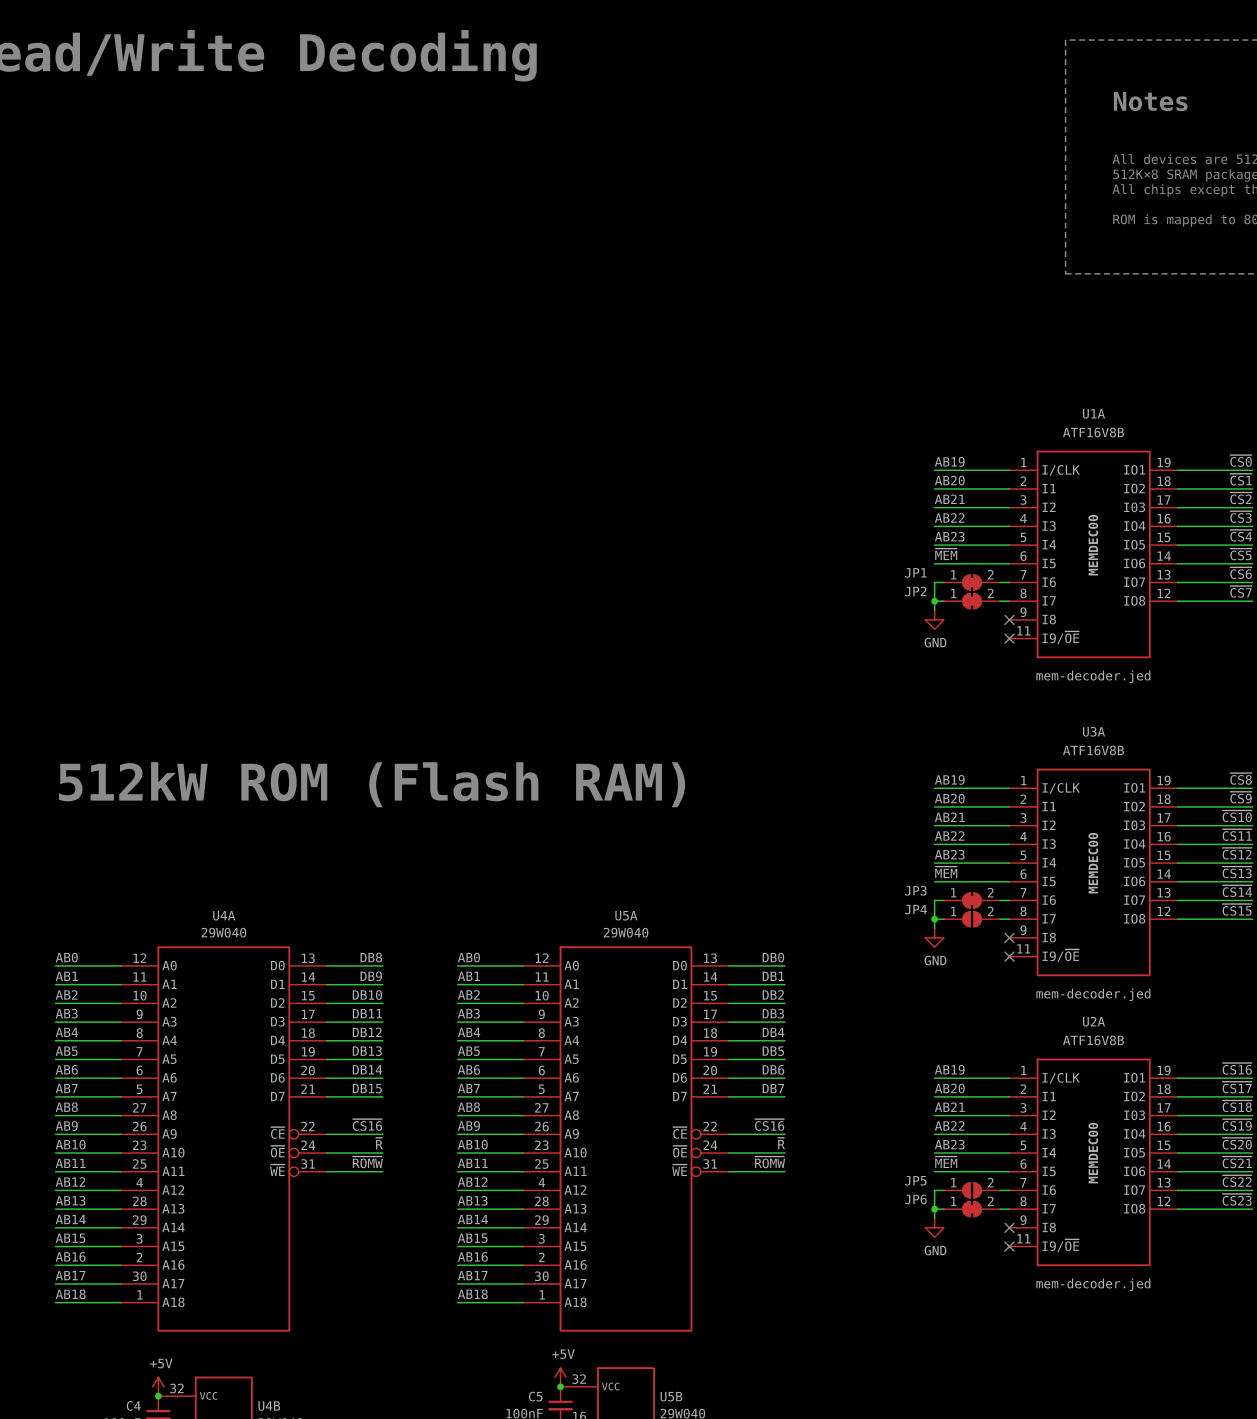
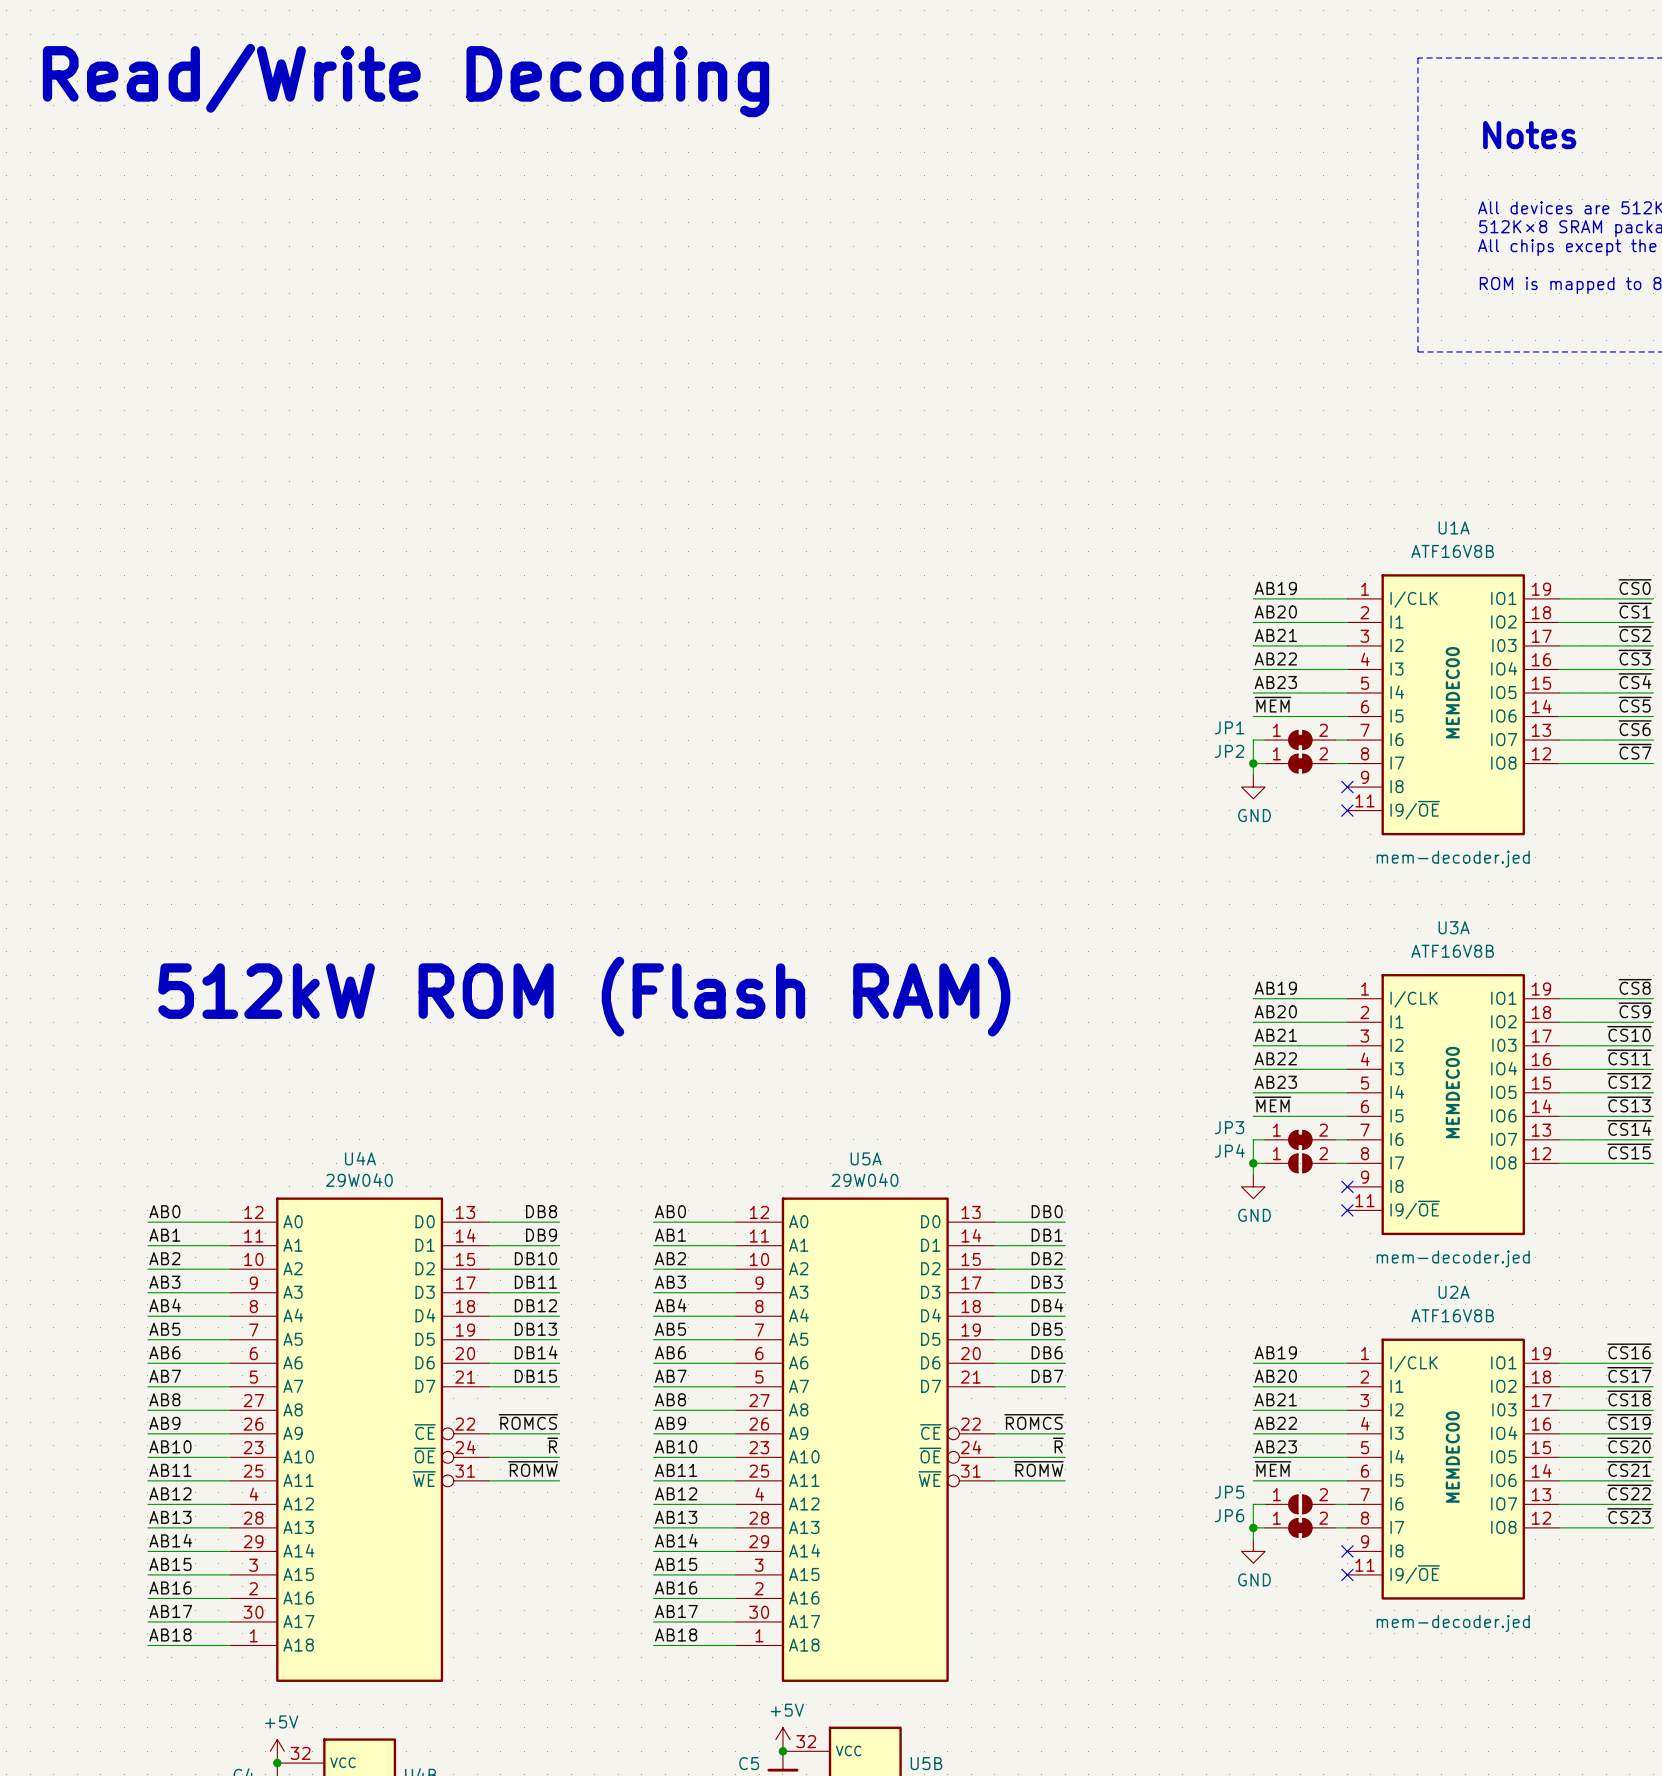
label: ~{CS16} (367, 1124) -> ~{ROMCS} (528, 1421)
label: ~{CS16} (769, 1124) -> ~{ROMCS} (1034, 1421)

